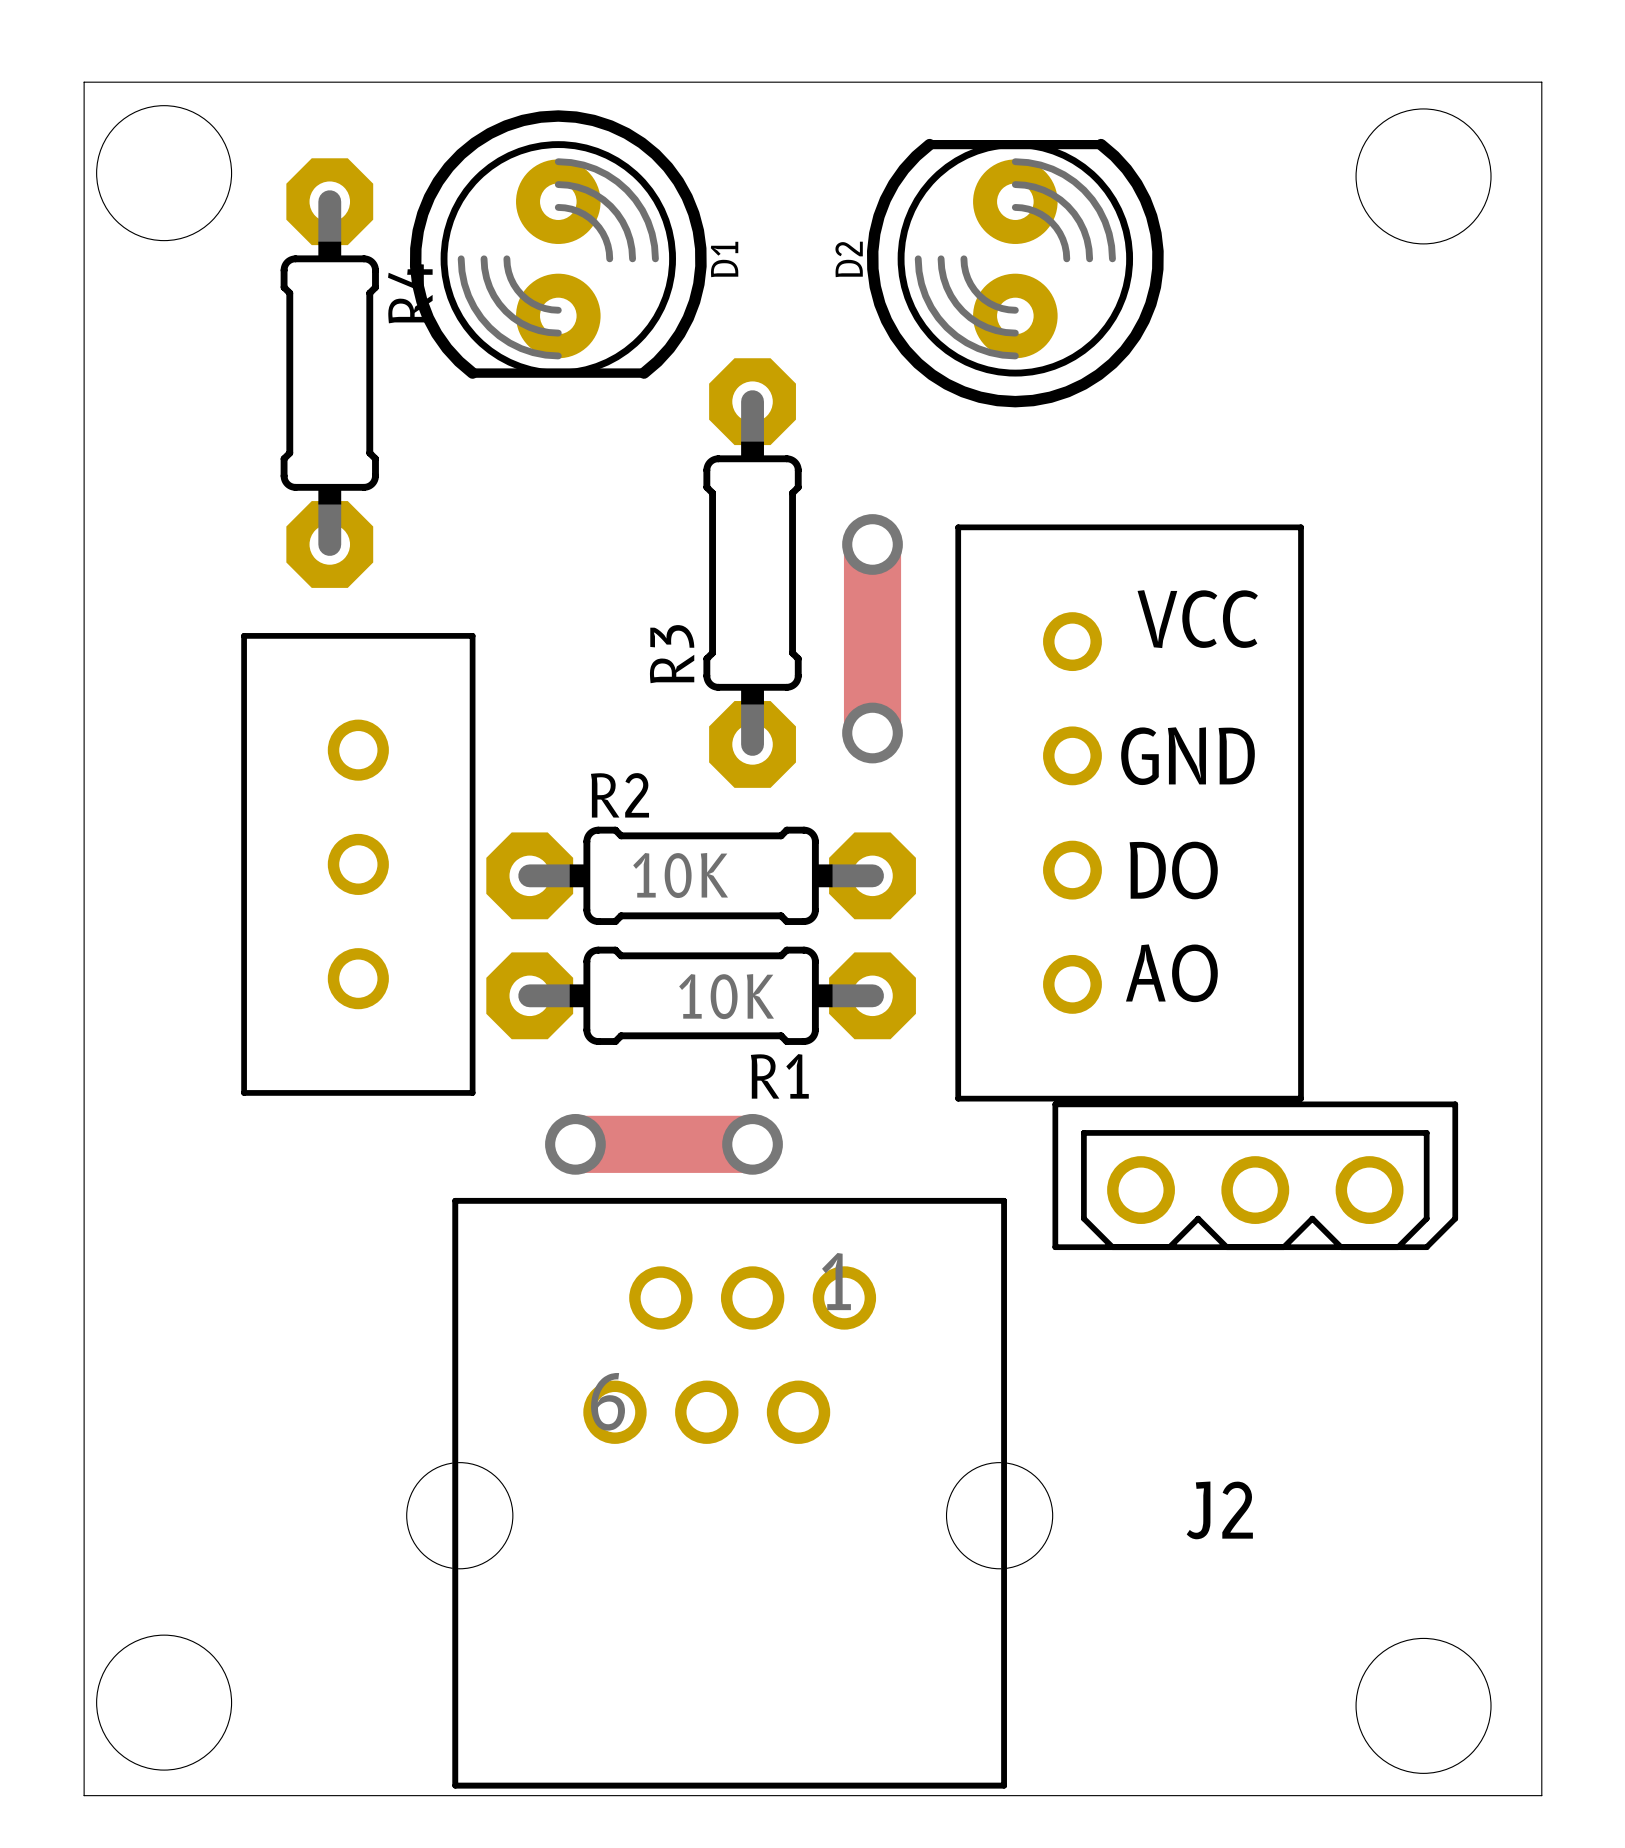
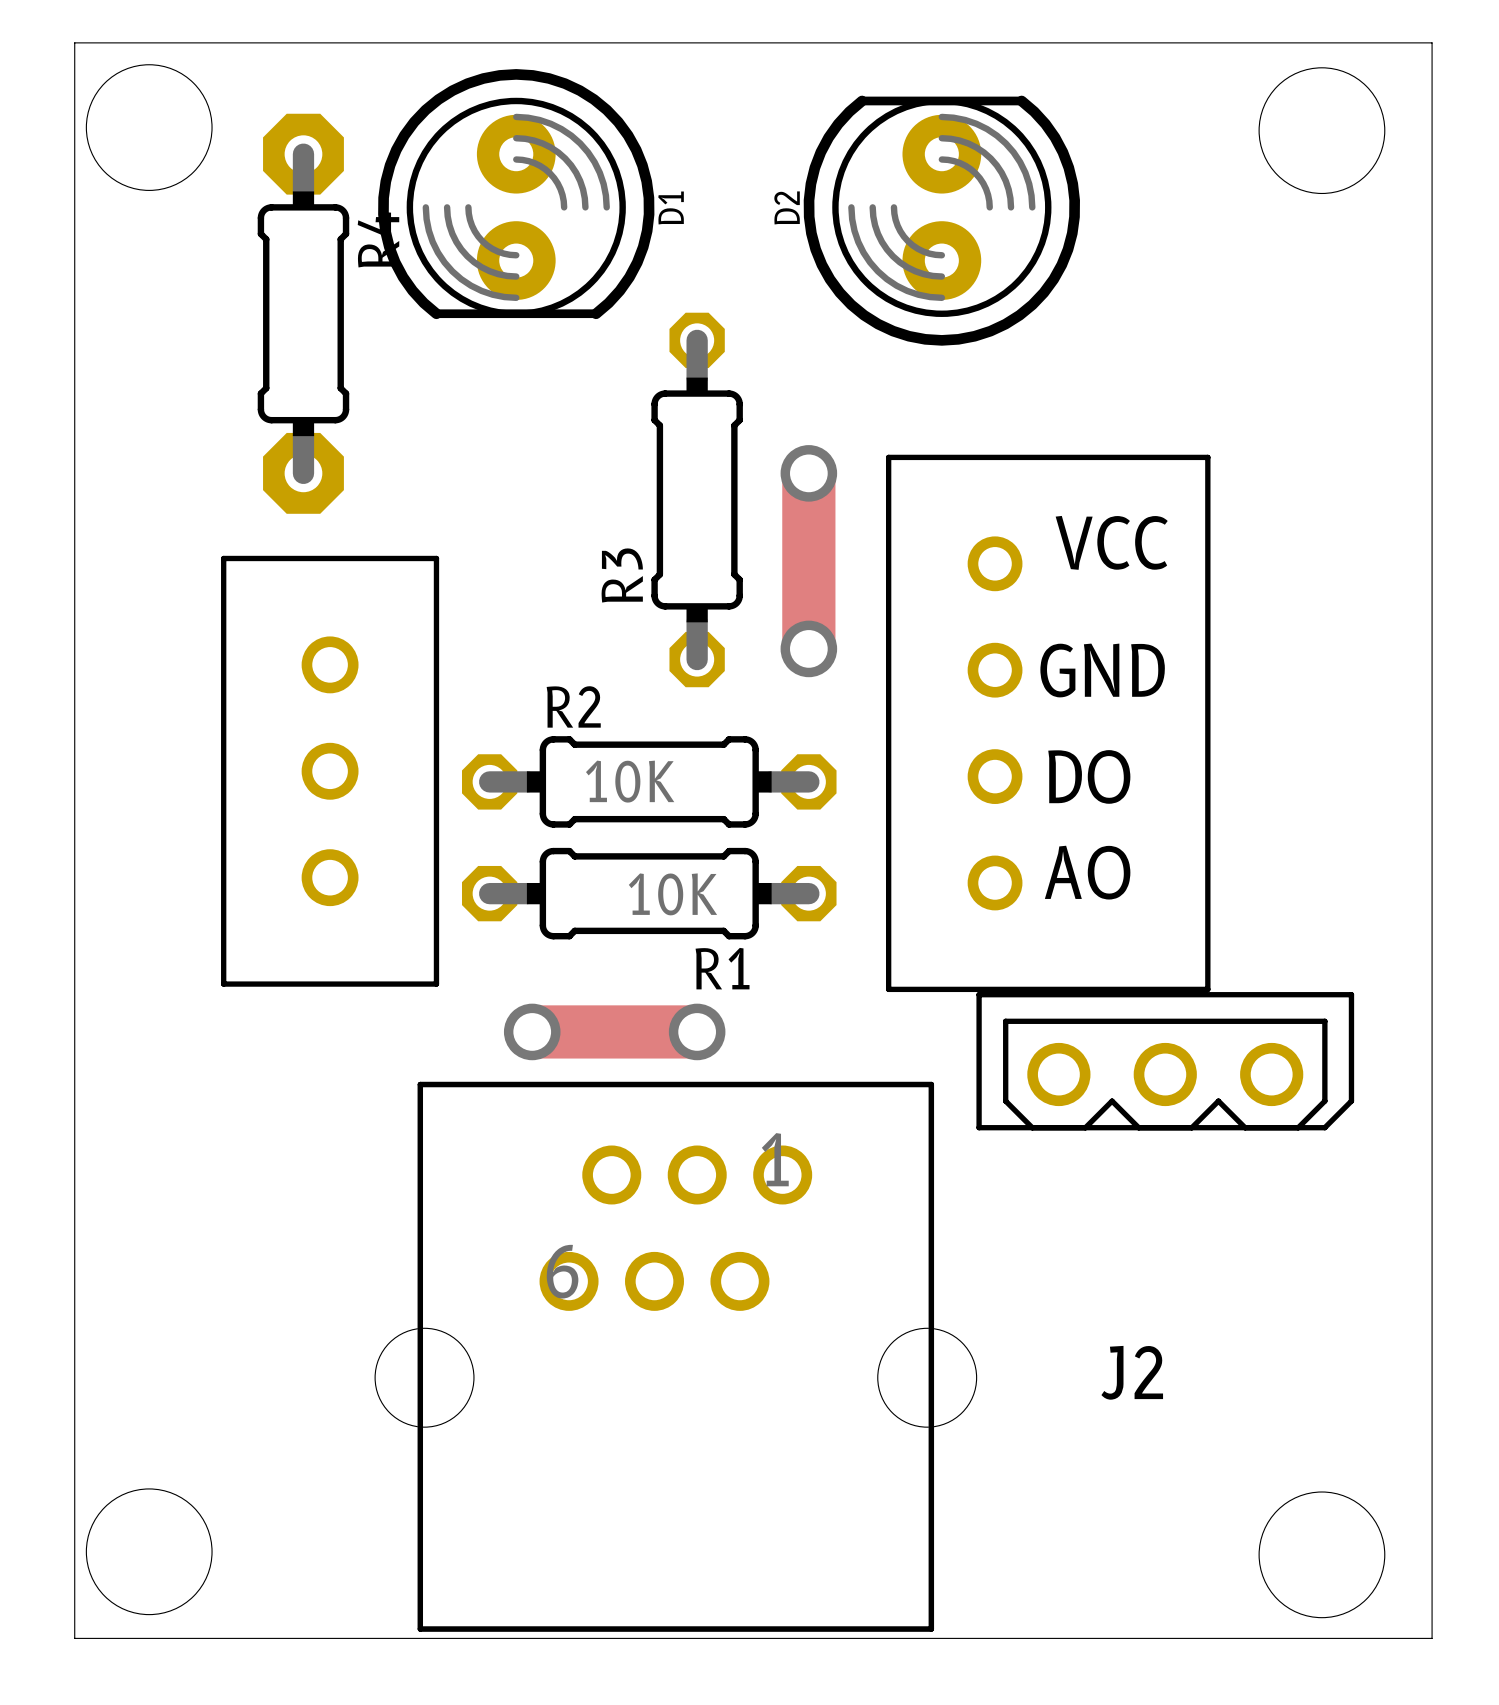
R3 footprint: [703, 358, 802, 788] -> [651, 312, 743, 688]
R2 footprint: [486, 826, 916, 925] -> [462, 736, 837, 828]
R1 footprint: [486, 946, 916, 1045] -> [462, 847, 837, 940]

